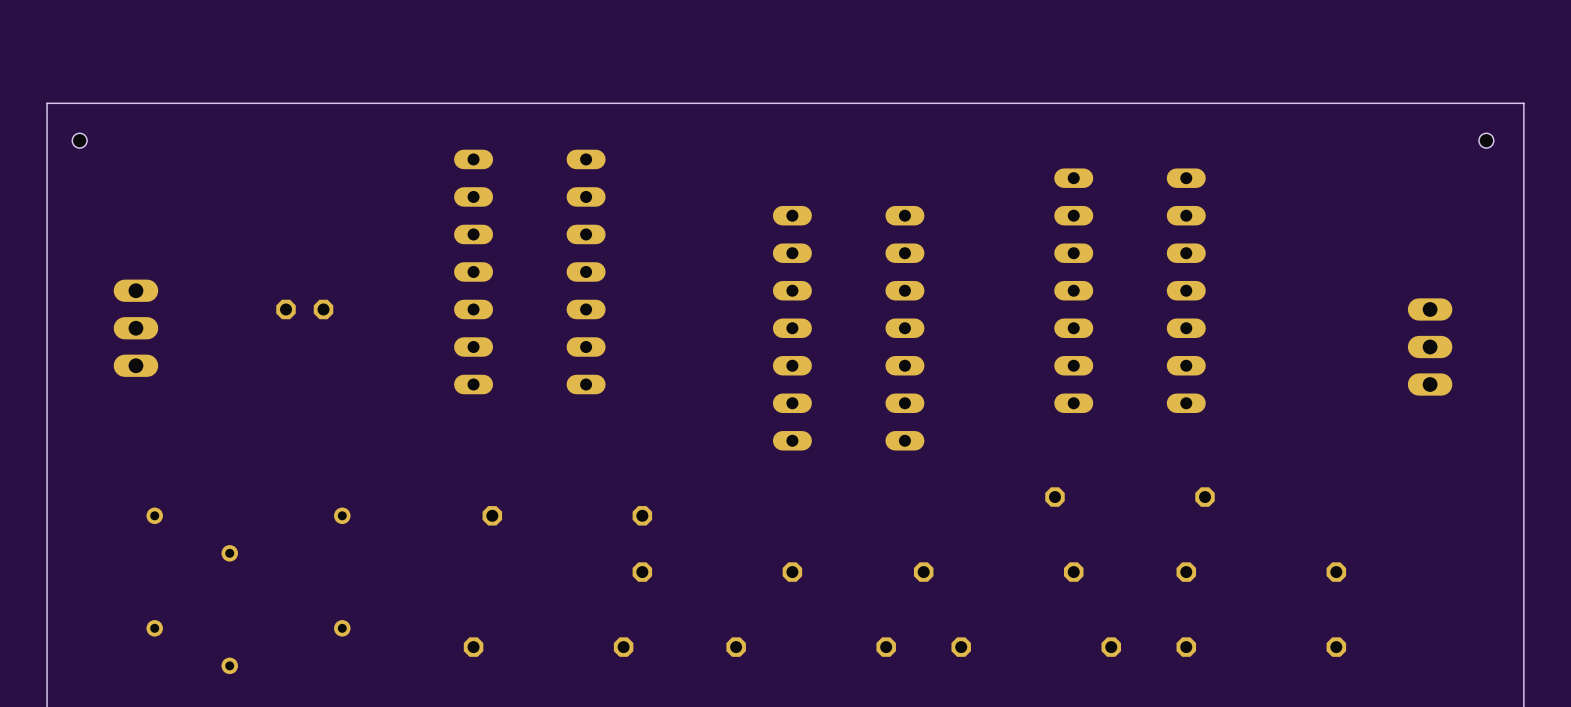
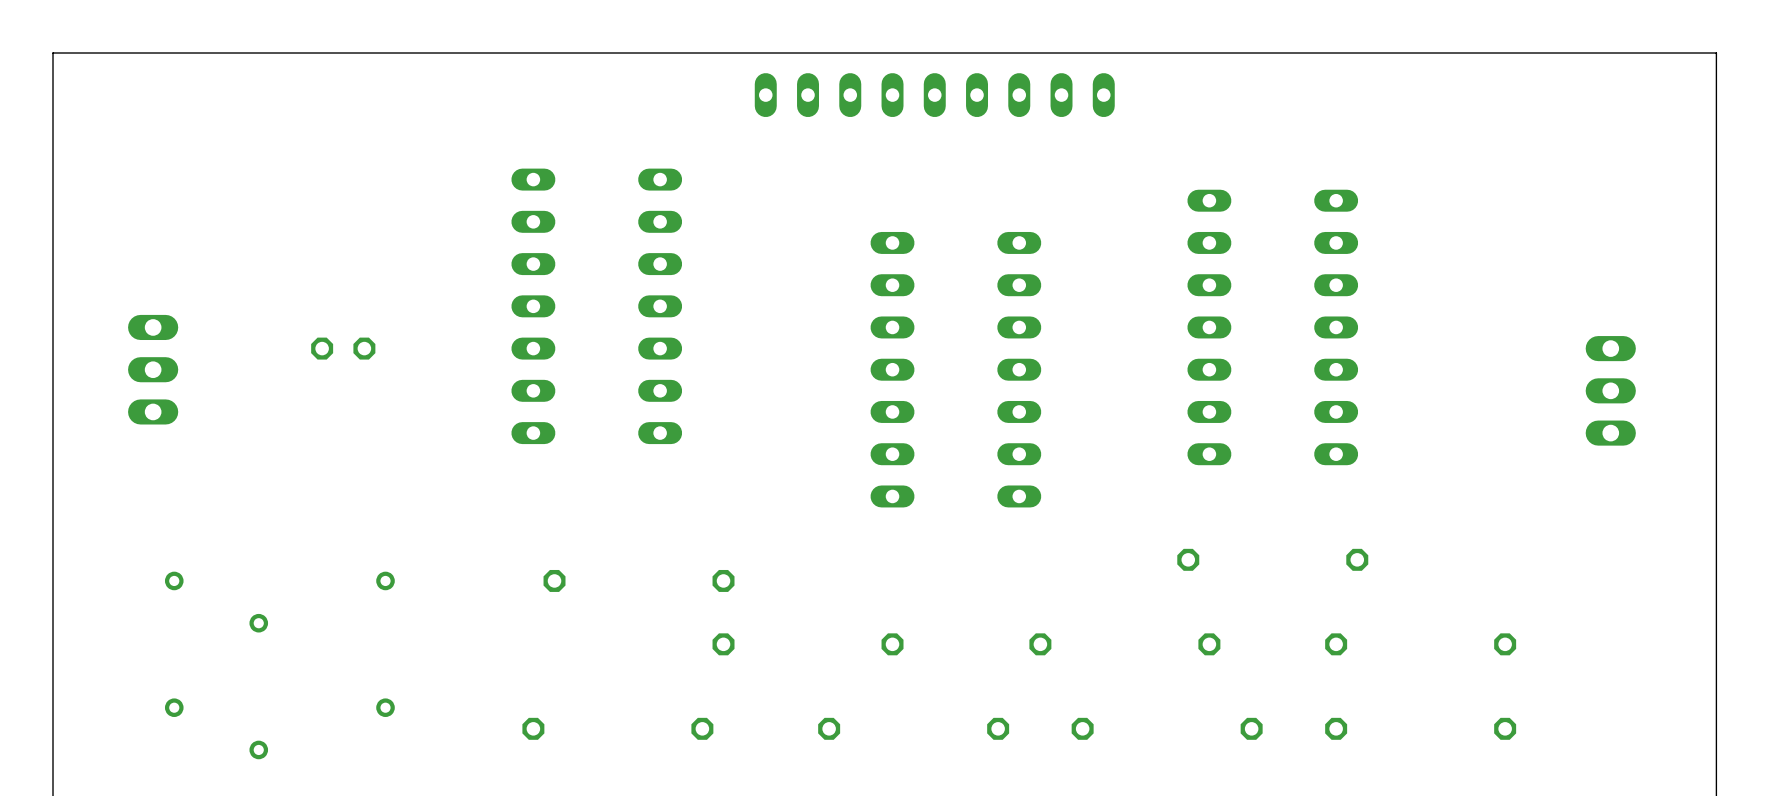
part: none -> (934, 95)
board edge: (1523, 103) (47, 103) -> (1716, 116) (1716, 53) (53, 53) (53, 116)
hole: (79, 140) -> none
hole: (1486, 140) -> none

